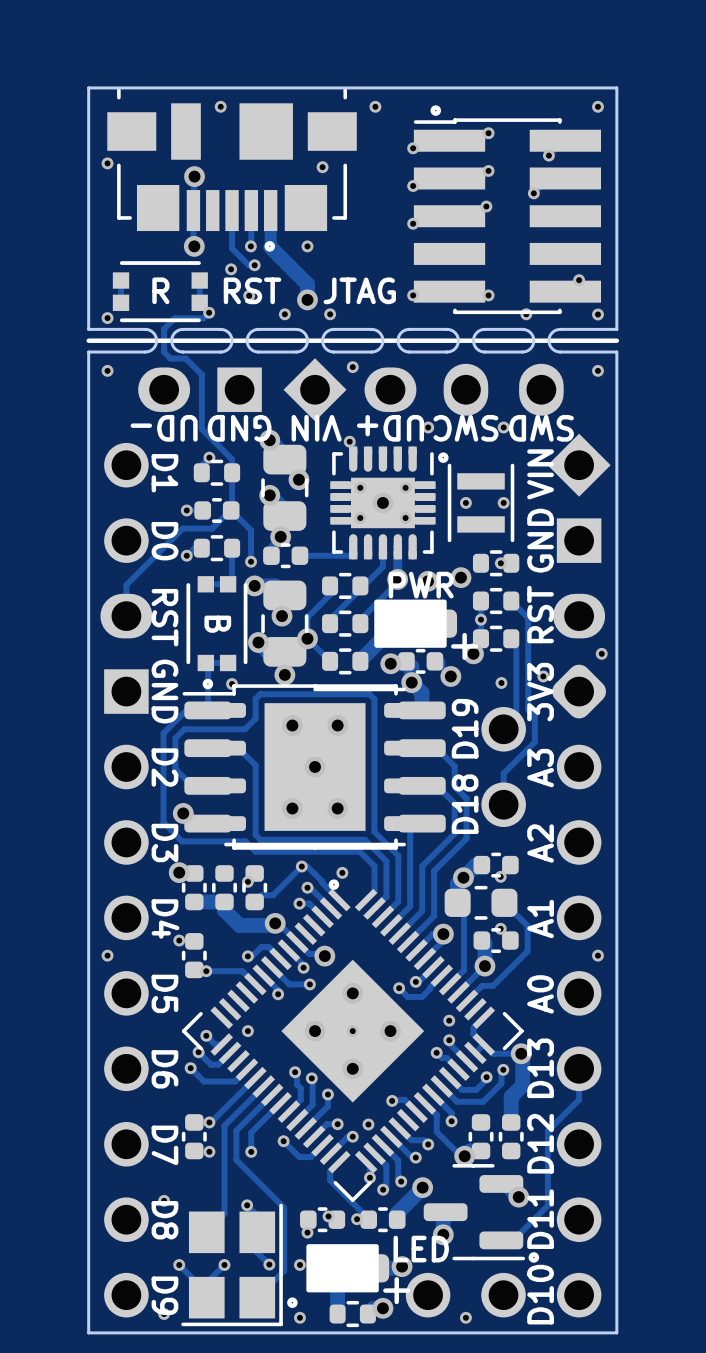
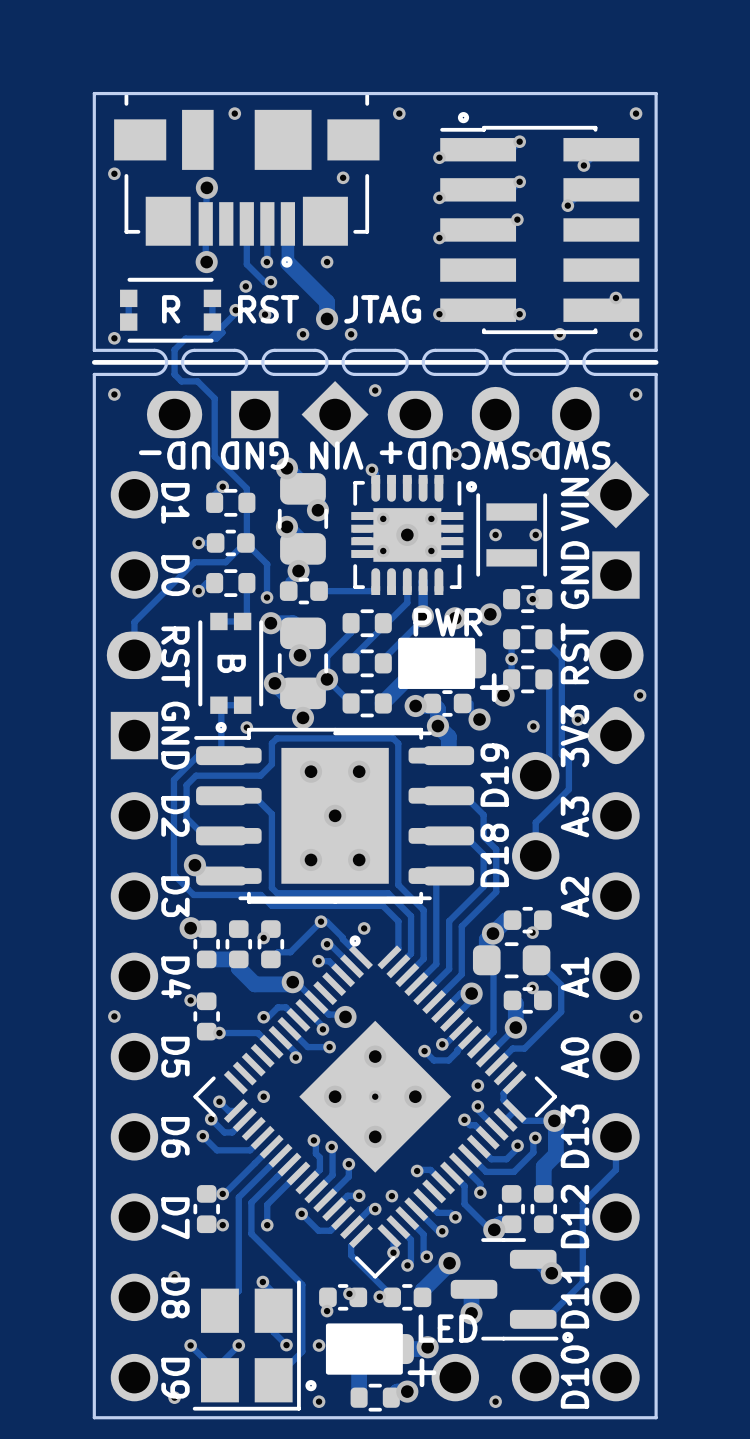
track: none -> (235, 310) (235, 313) (210, 338)
via position: (209, 312) -> (235, 310)

